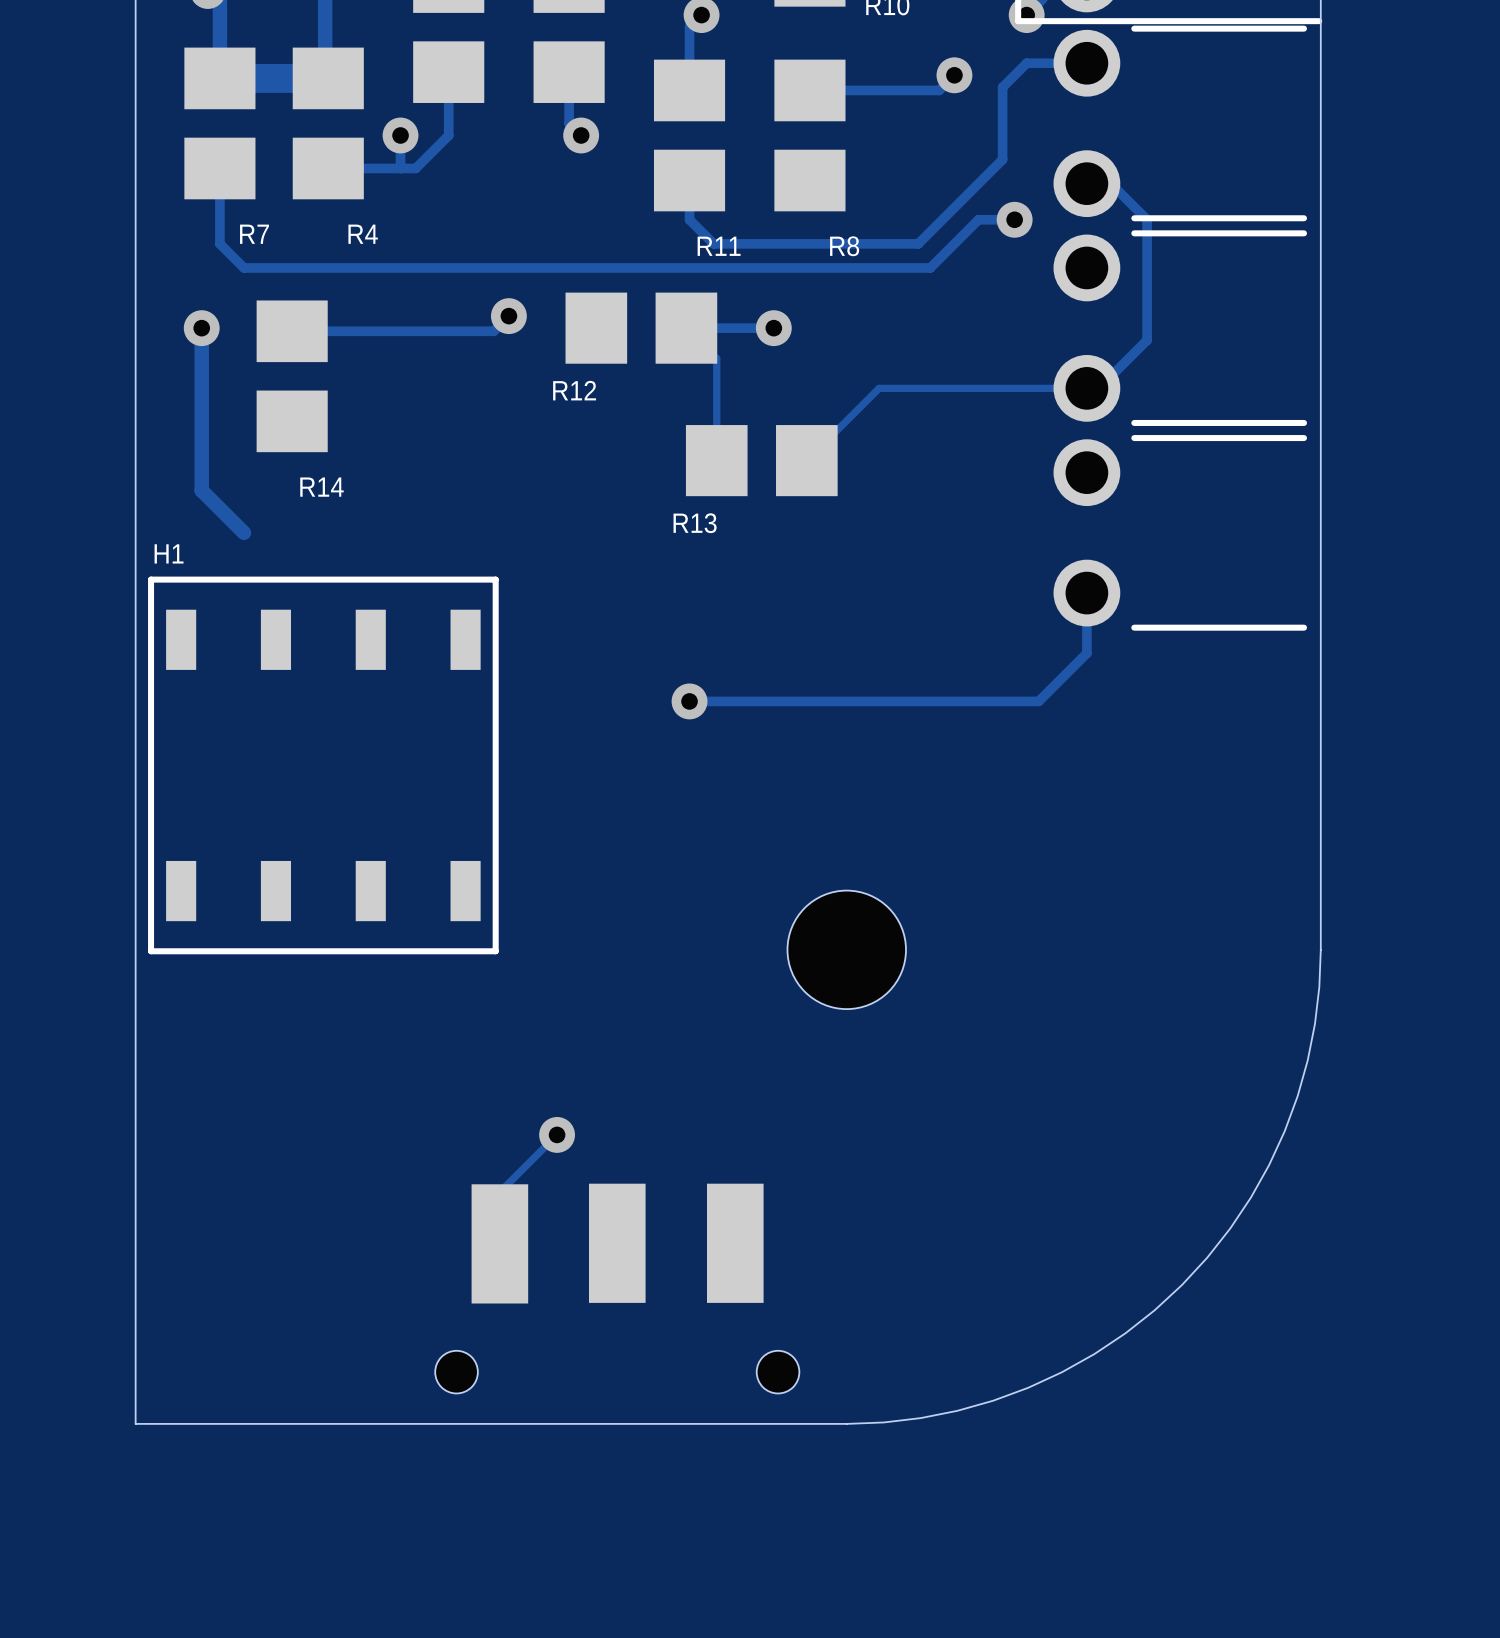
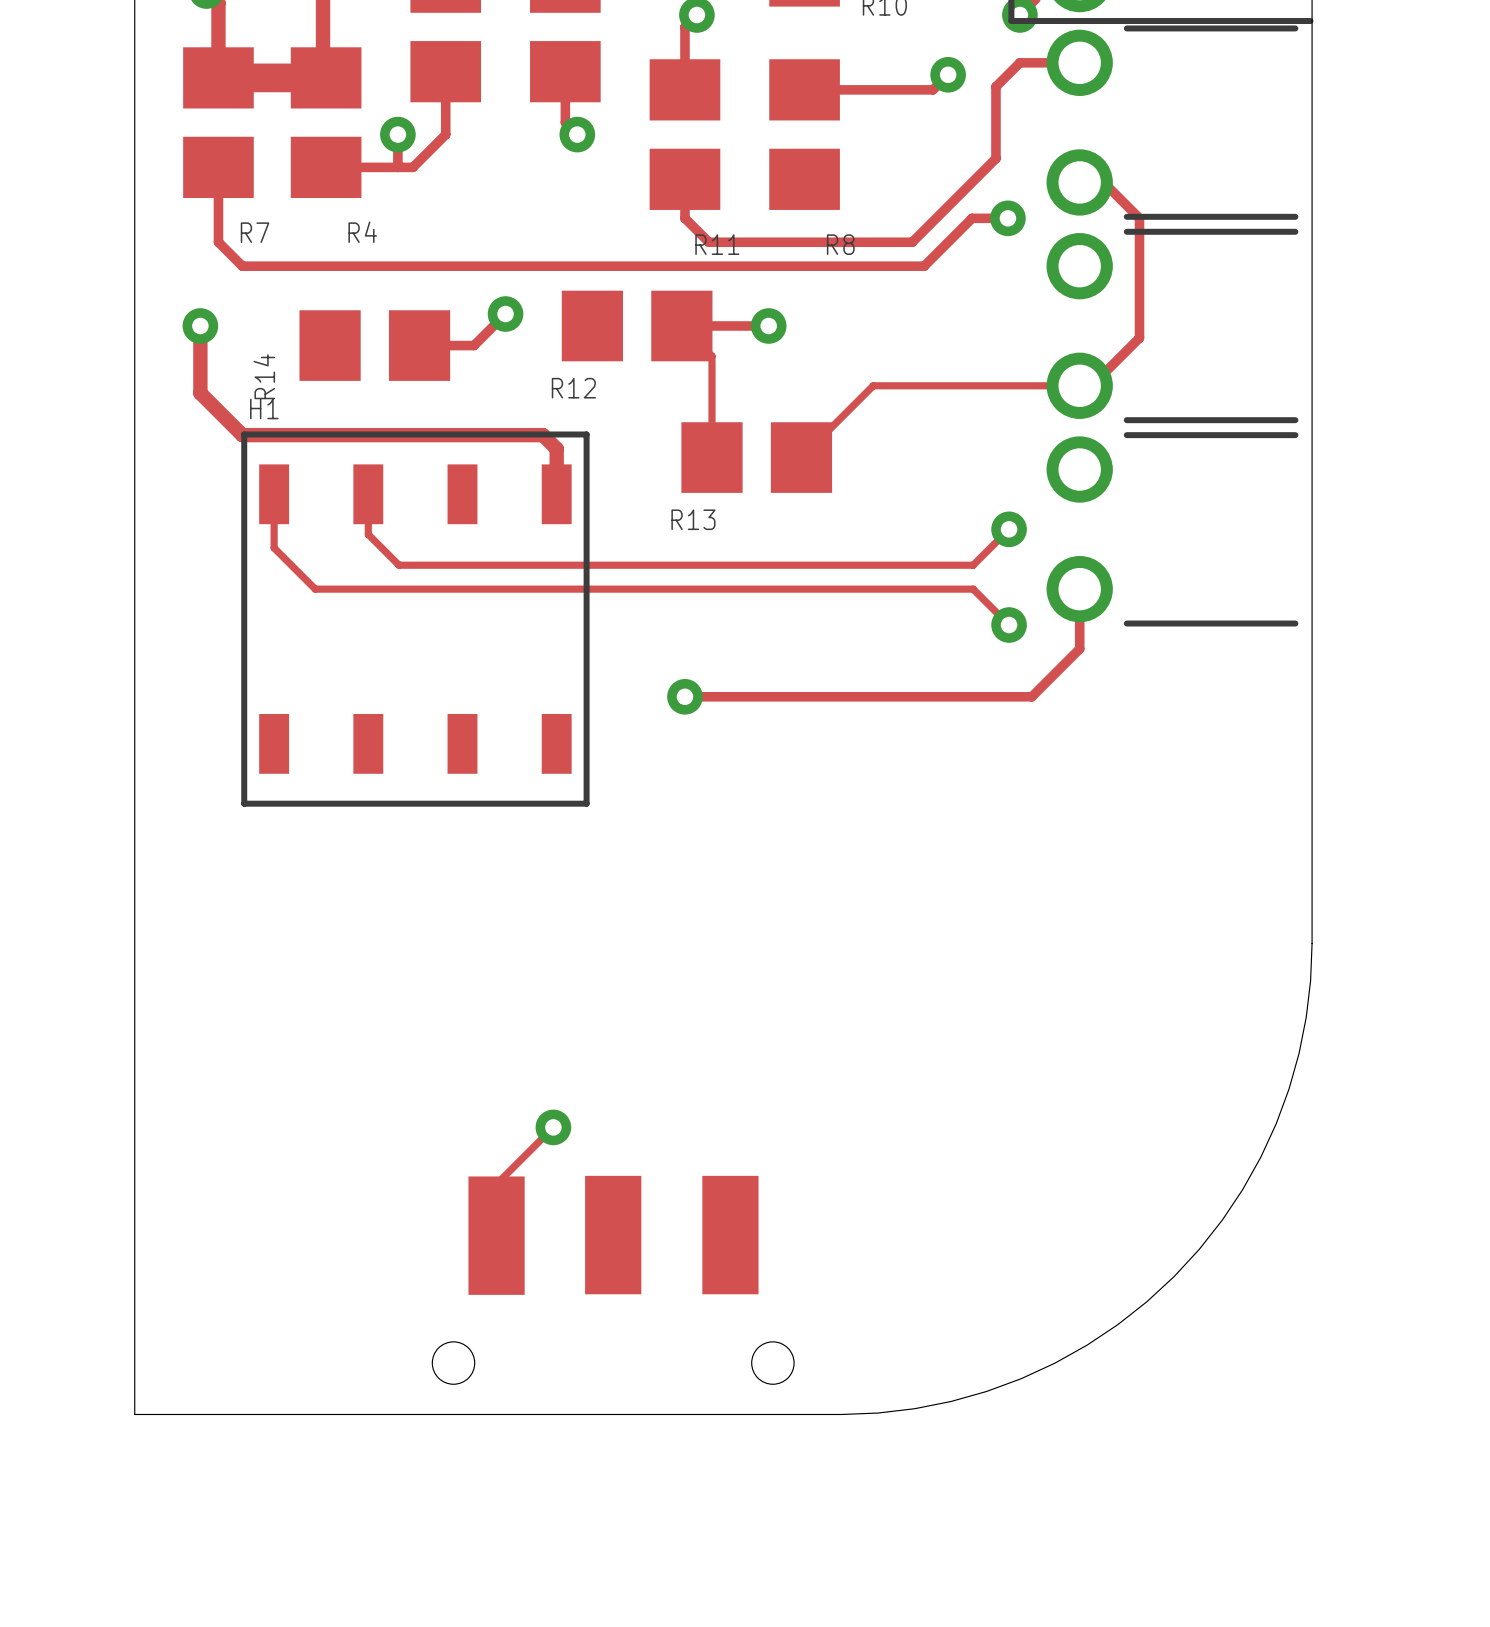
track: (292, 331) (493, 331) -> (419, 345) (473, 345) (490, 329)
R14 rotation: 0° (292, 376) -> 90° clockwise (374, 345)
track: (201, 395) (201, 490) (244, 532) -> (200, 393) (242, 435) (542, 435) (556, 448) (556, 494)
track: none -> (274, 494) (274, 547) (315, 589) (973, 589) (1009, 625)
track: none -> (368, 494) (368, 534) (399, 565) (973, 565) (1009, 529)
via: none -> (1009, 529)
via: none -> (1009, 625)
H1 position: (323, 765) -> (415, 619)
hole: (846, 949) -> none

